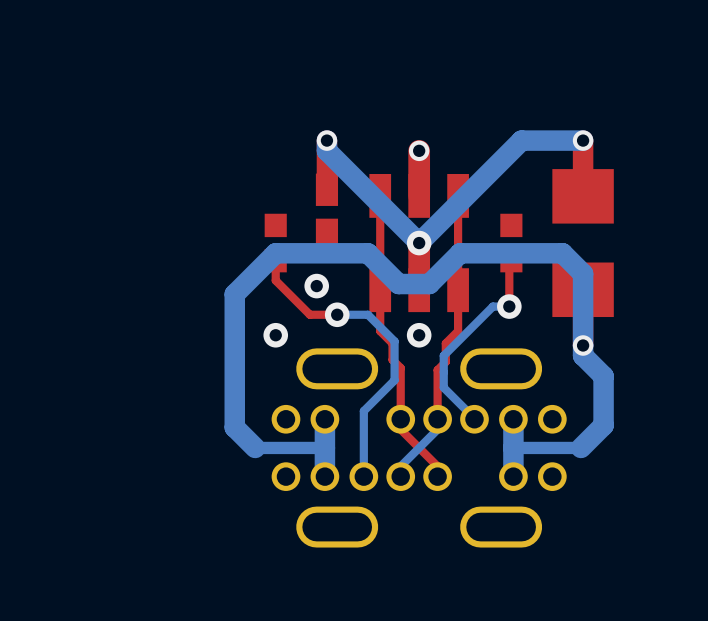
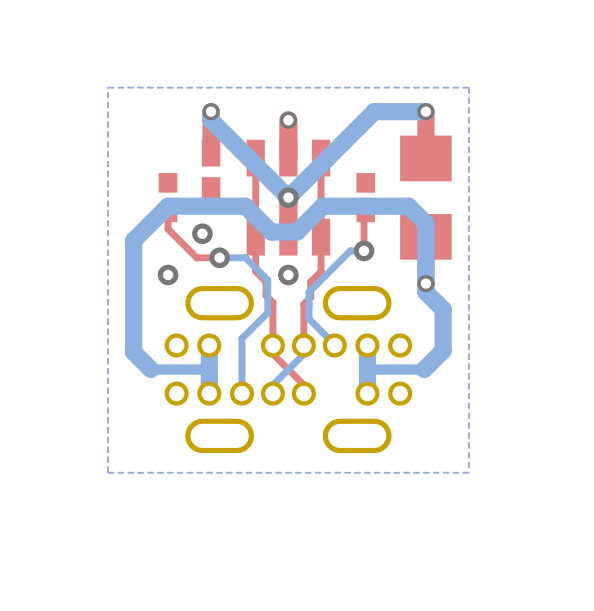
bottom zone outline: none -> (468, 87) (107, 87) (107, 472) (468, 472) (468, 87)

